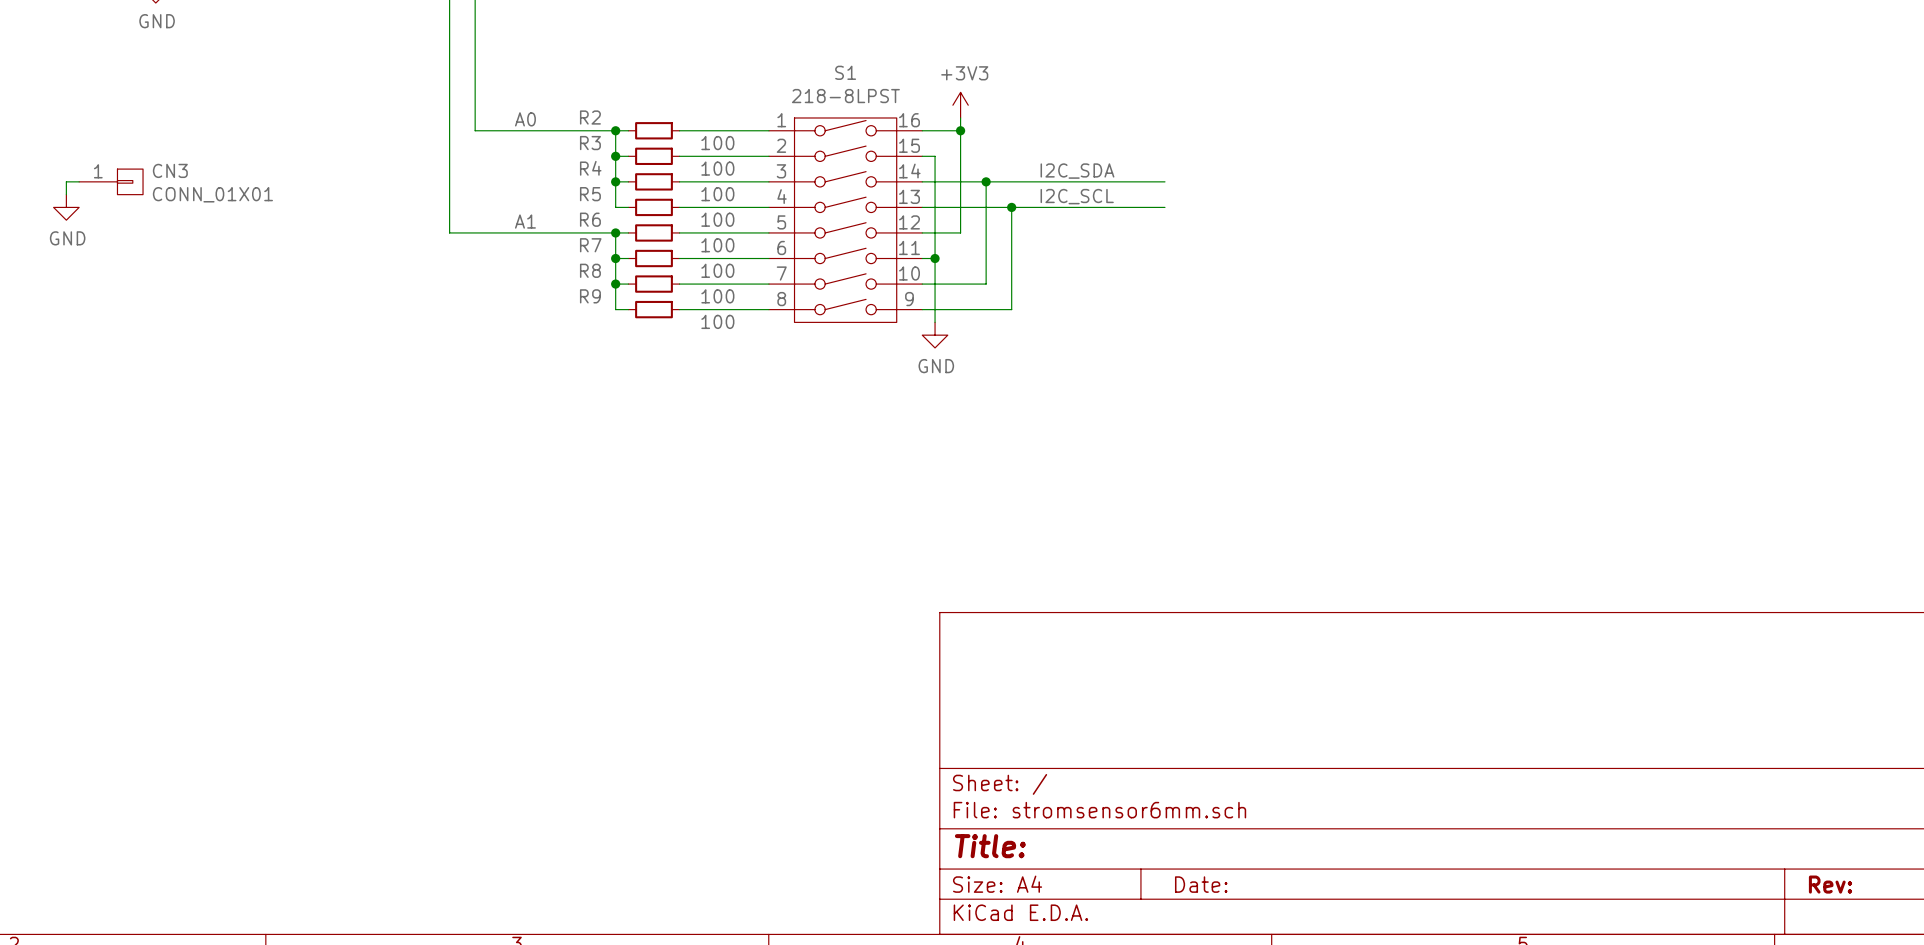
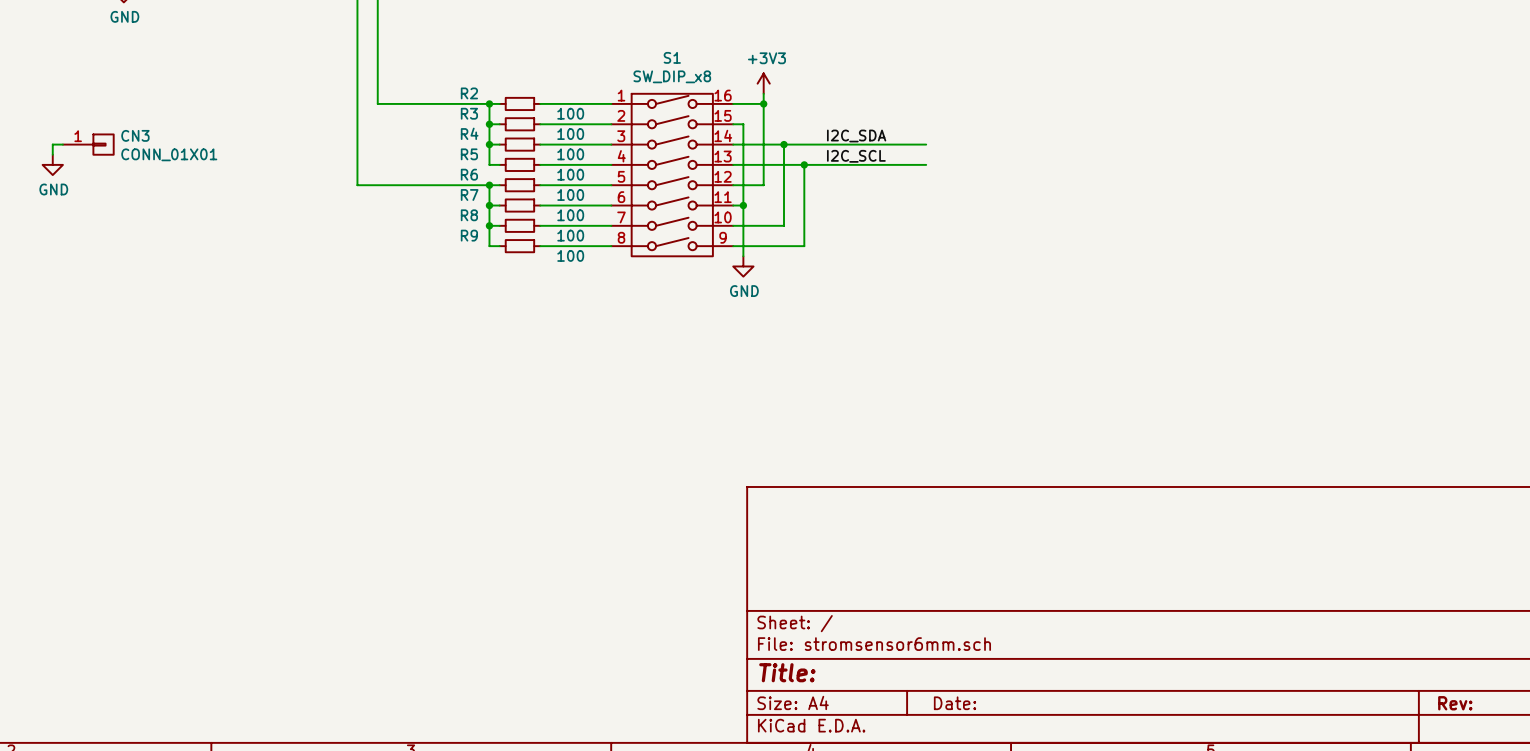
S1 value: 218-8LPST (845, 96) -> SW_DIP_x8 (672, 76)
label: A0 (525, 119) -> none
label: A1 (525, 221) -> none

